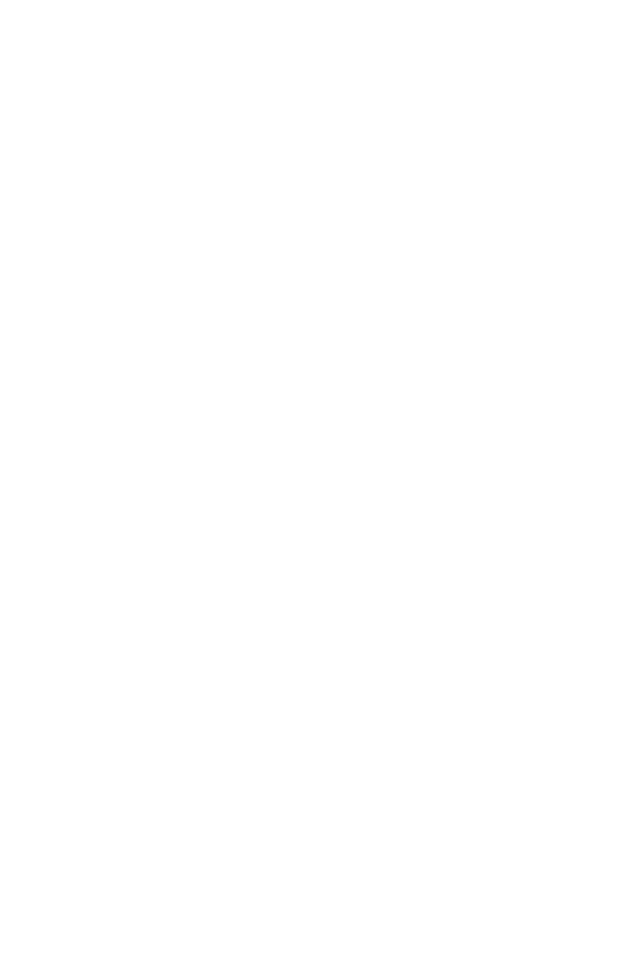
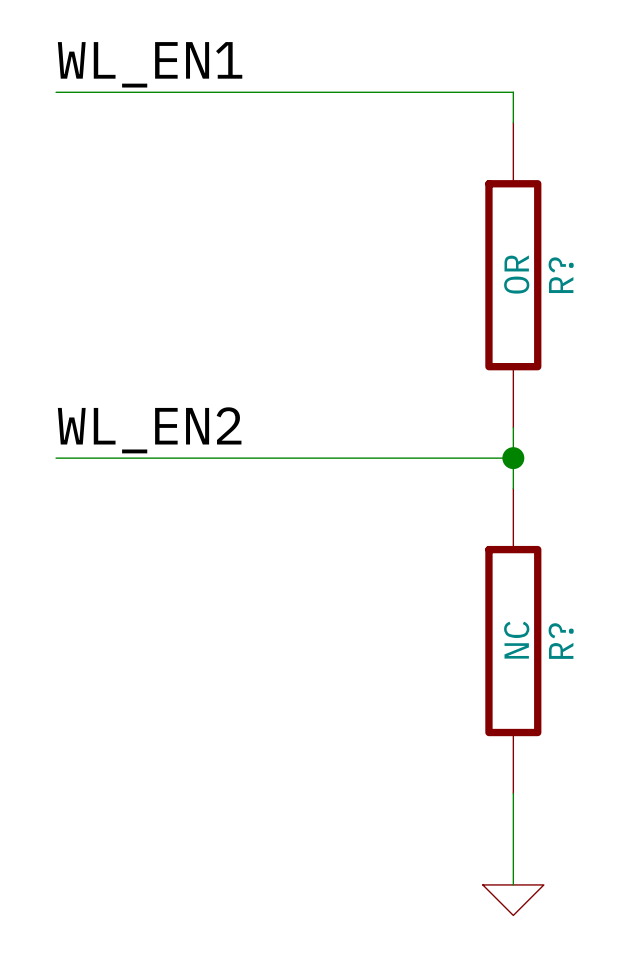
label: none -> WL_EN1 (150, 64)
wire: none -> (56, 92) (513, 92) (513, 122)
R?: none -> OR (513, 275)
wire: none -> (513, 427) (513, 488)
label: none -> WL_EN2 (149, 430)
wire: none -> (56, 458) (513, 458)
junction: none -> (513, 458)
R?: none -> NC (513, 641)
wire: none -> (513, 793) (513, 884)
power symbol: none -> (513, 900)

